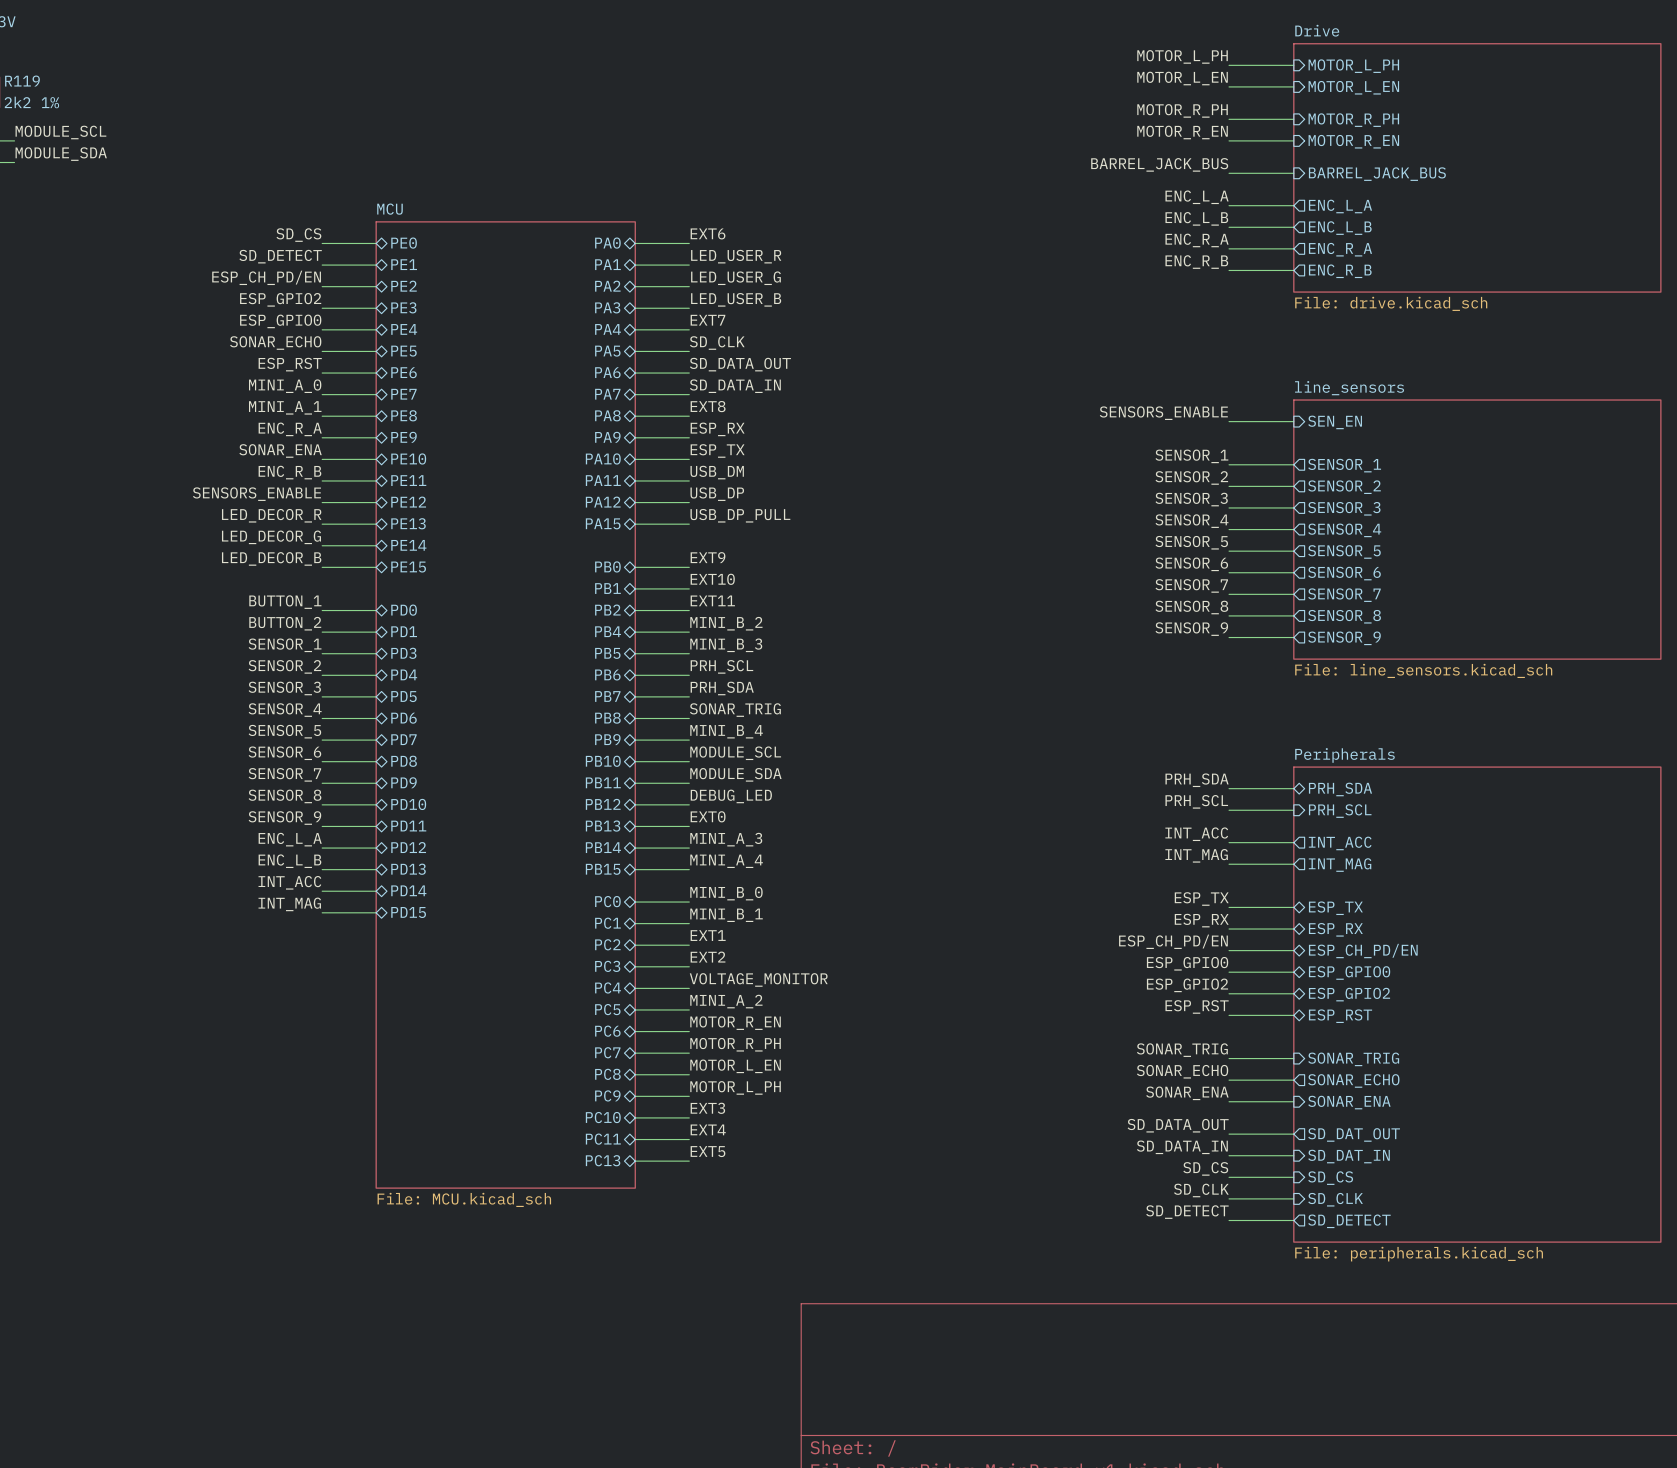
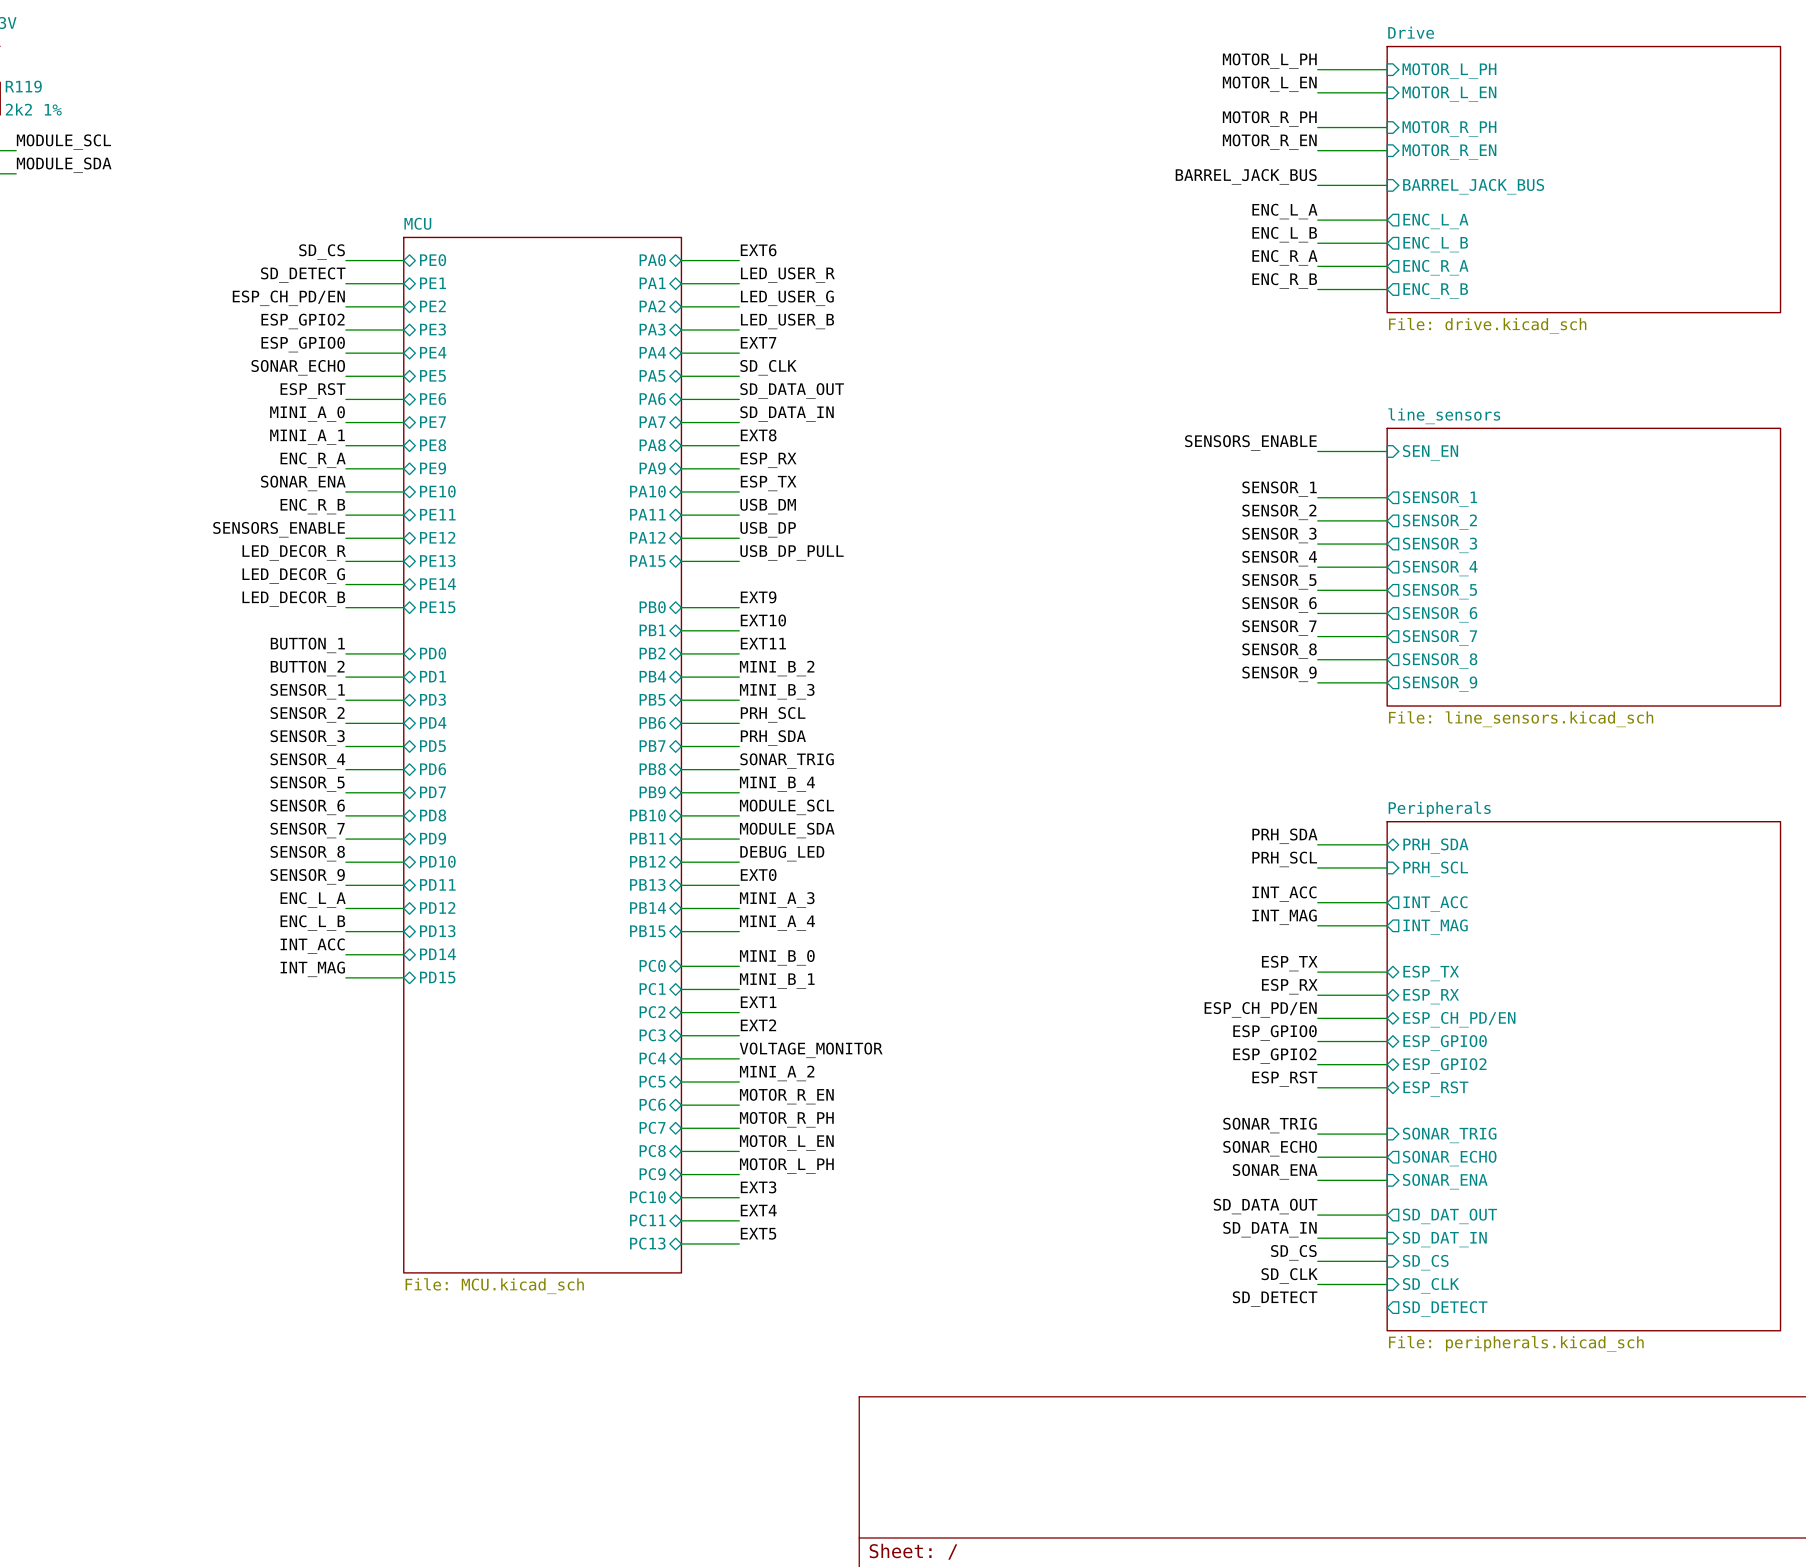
wire: (1229, 1220) (1293, 1220) -> none

